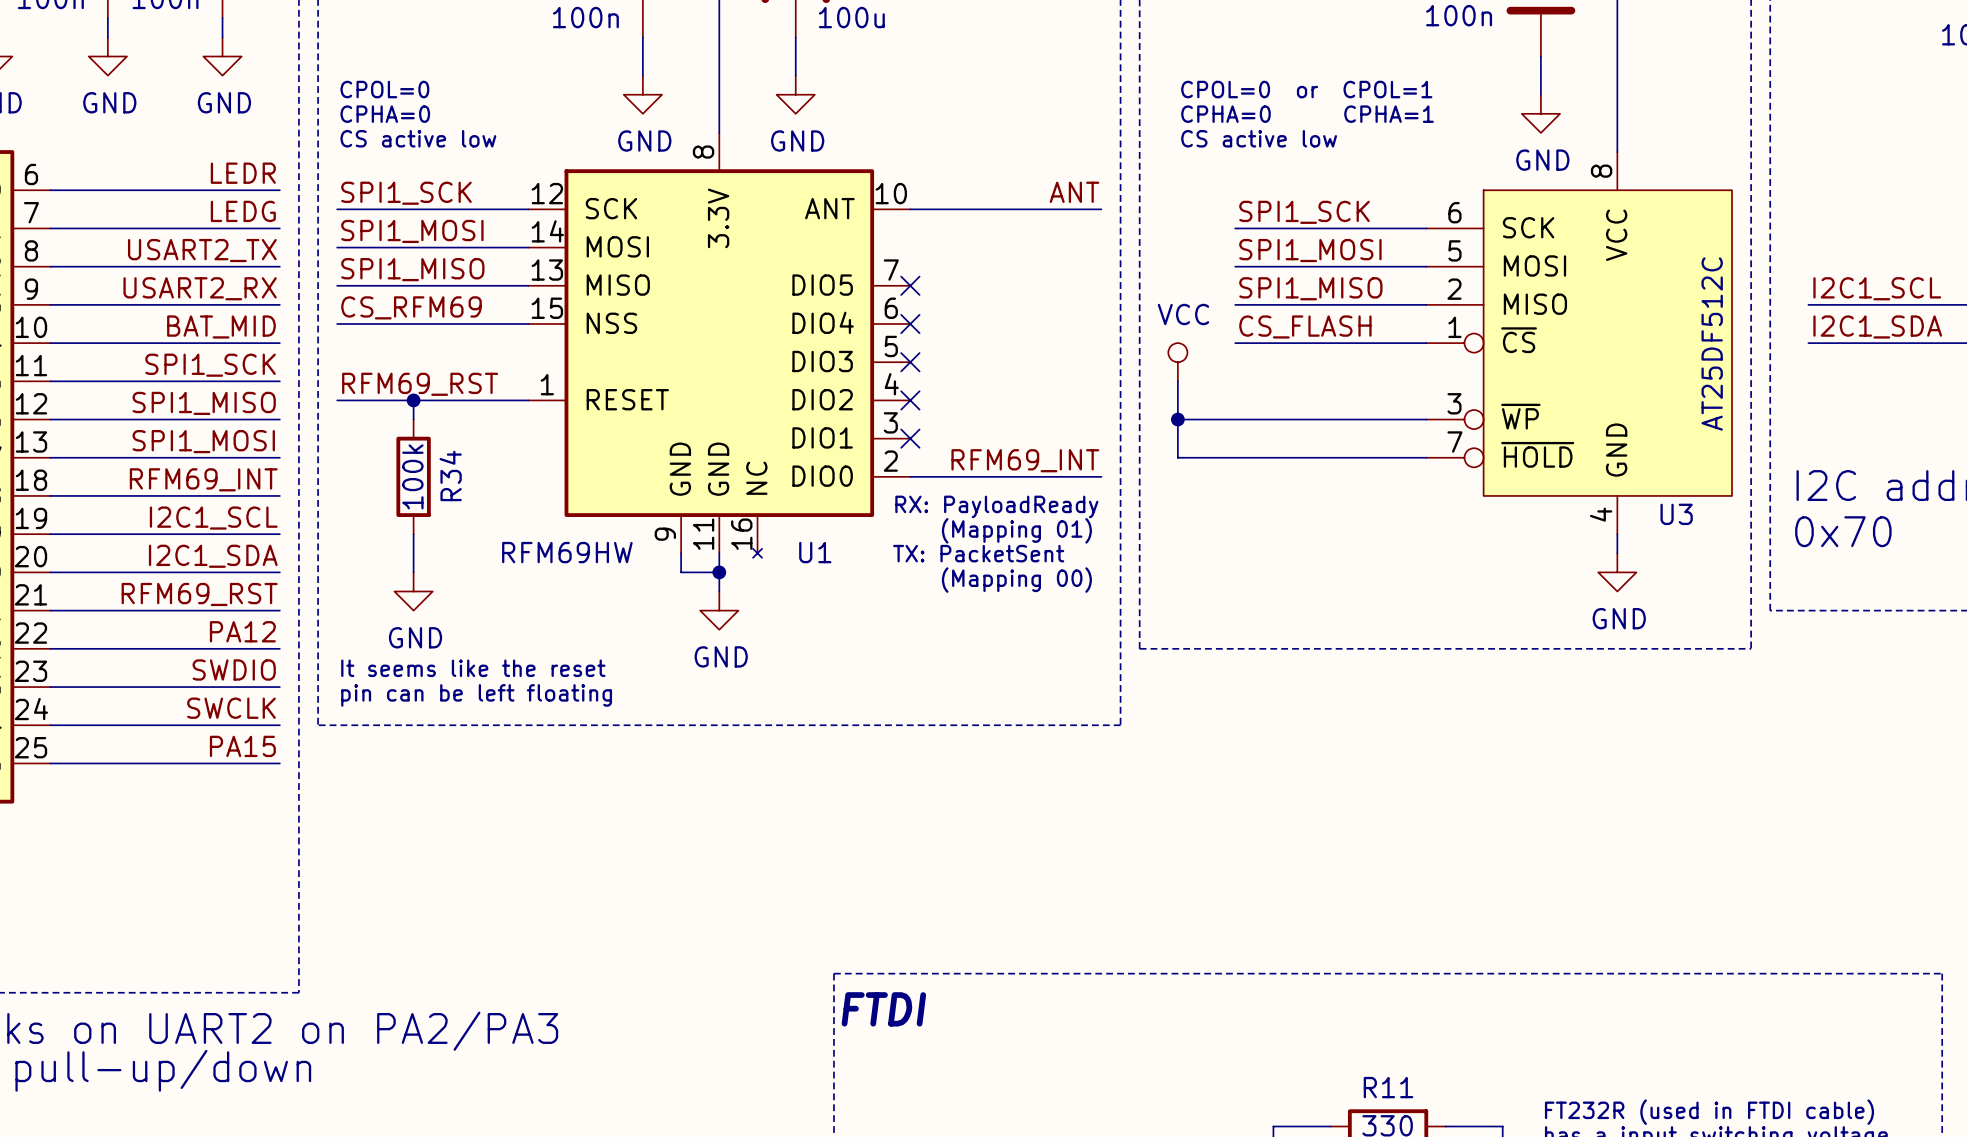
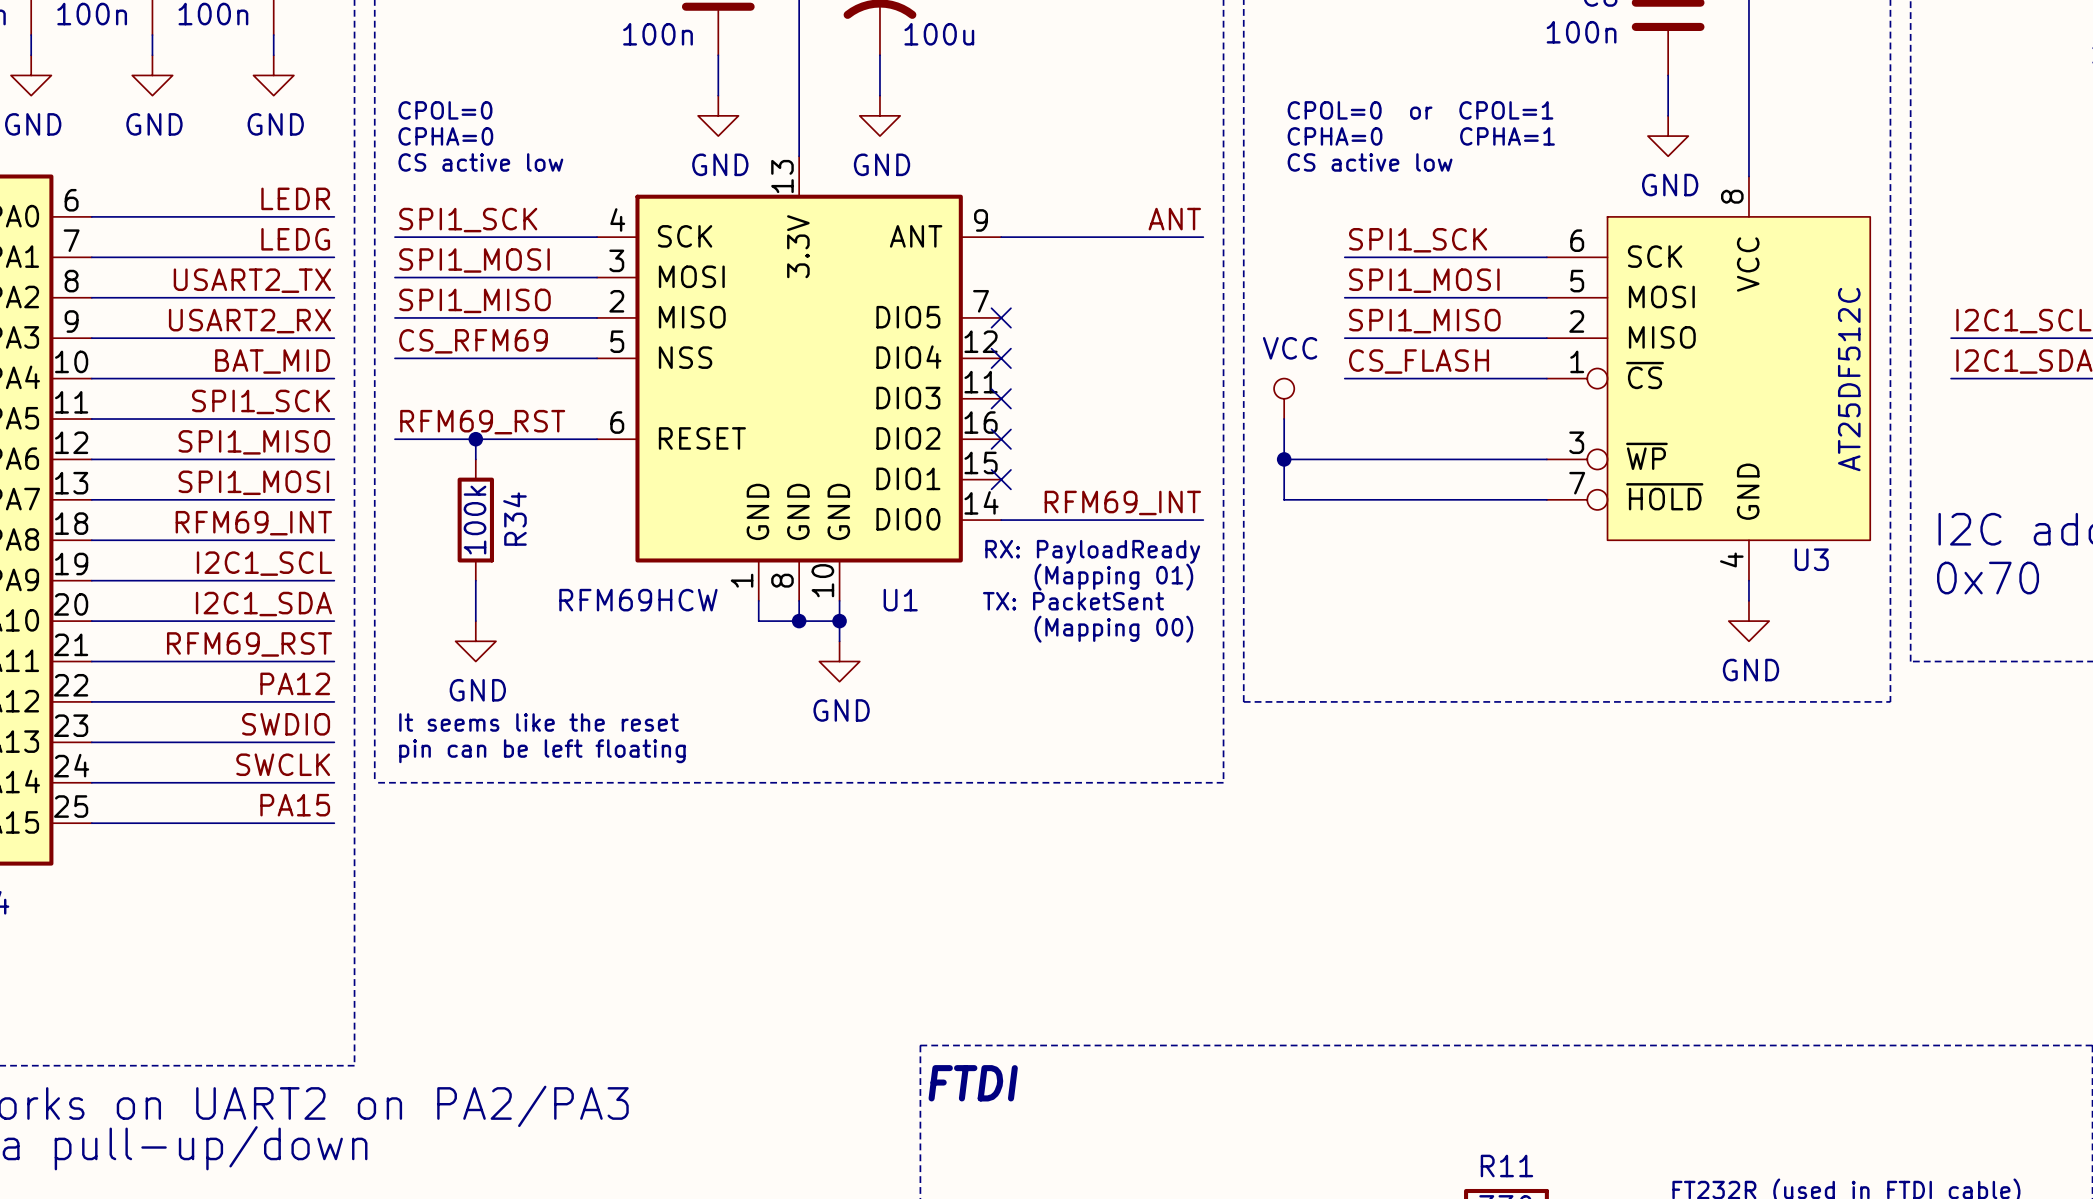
U1 symbol: [528, 132, 911, 558] -> [597, 156, 1002, 601]
U1 value: RFM69HW (567, 552) -> RFM69HCW (638, 600)
wire: none -> (839, 600) (839, 641)
wire: (719, 572) (719, 591) -> (799, 621) (839, 621)
junction: none -> (839, 621)
power symbol position: GND (719, 610) -> GND (839, 661)

